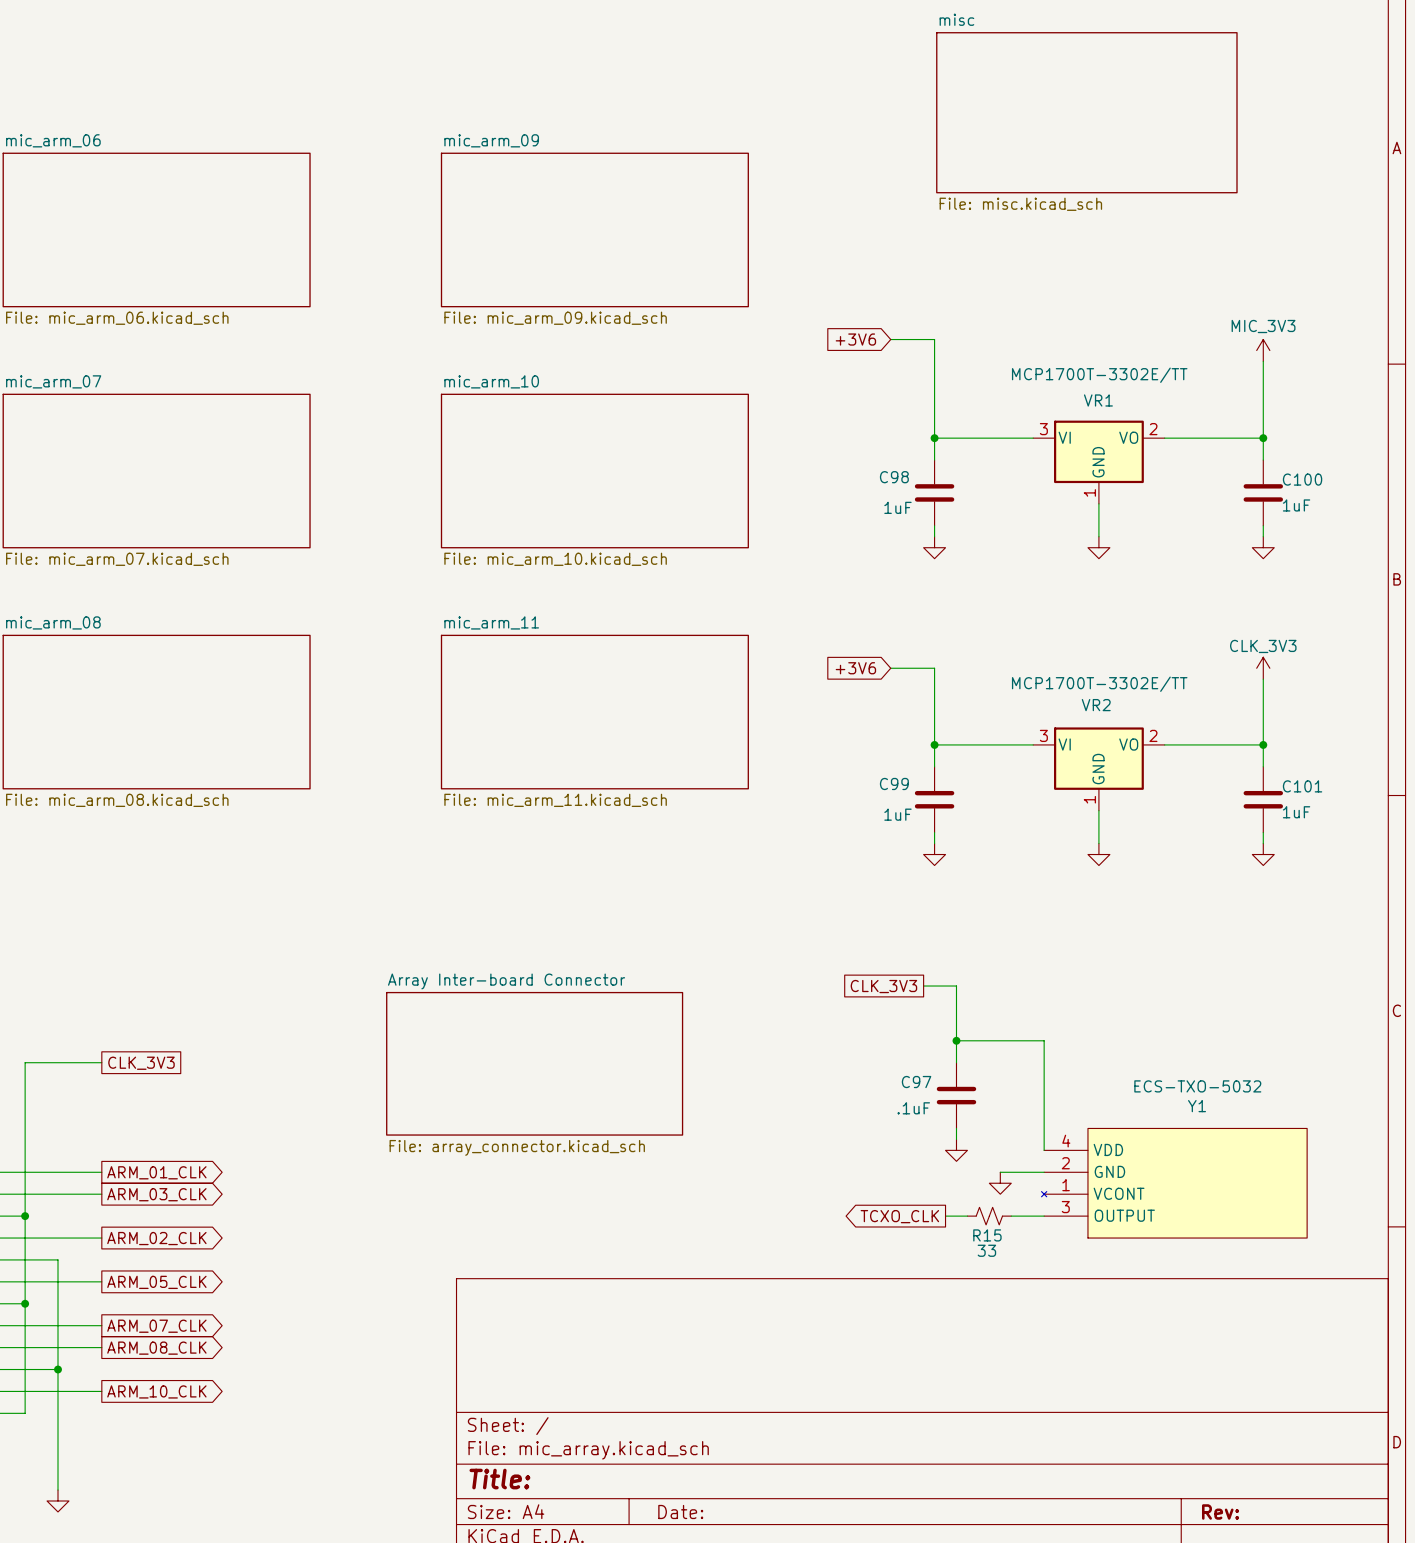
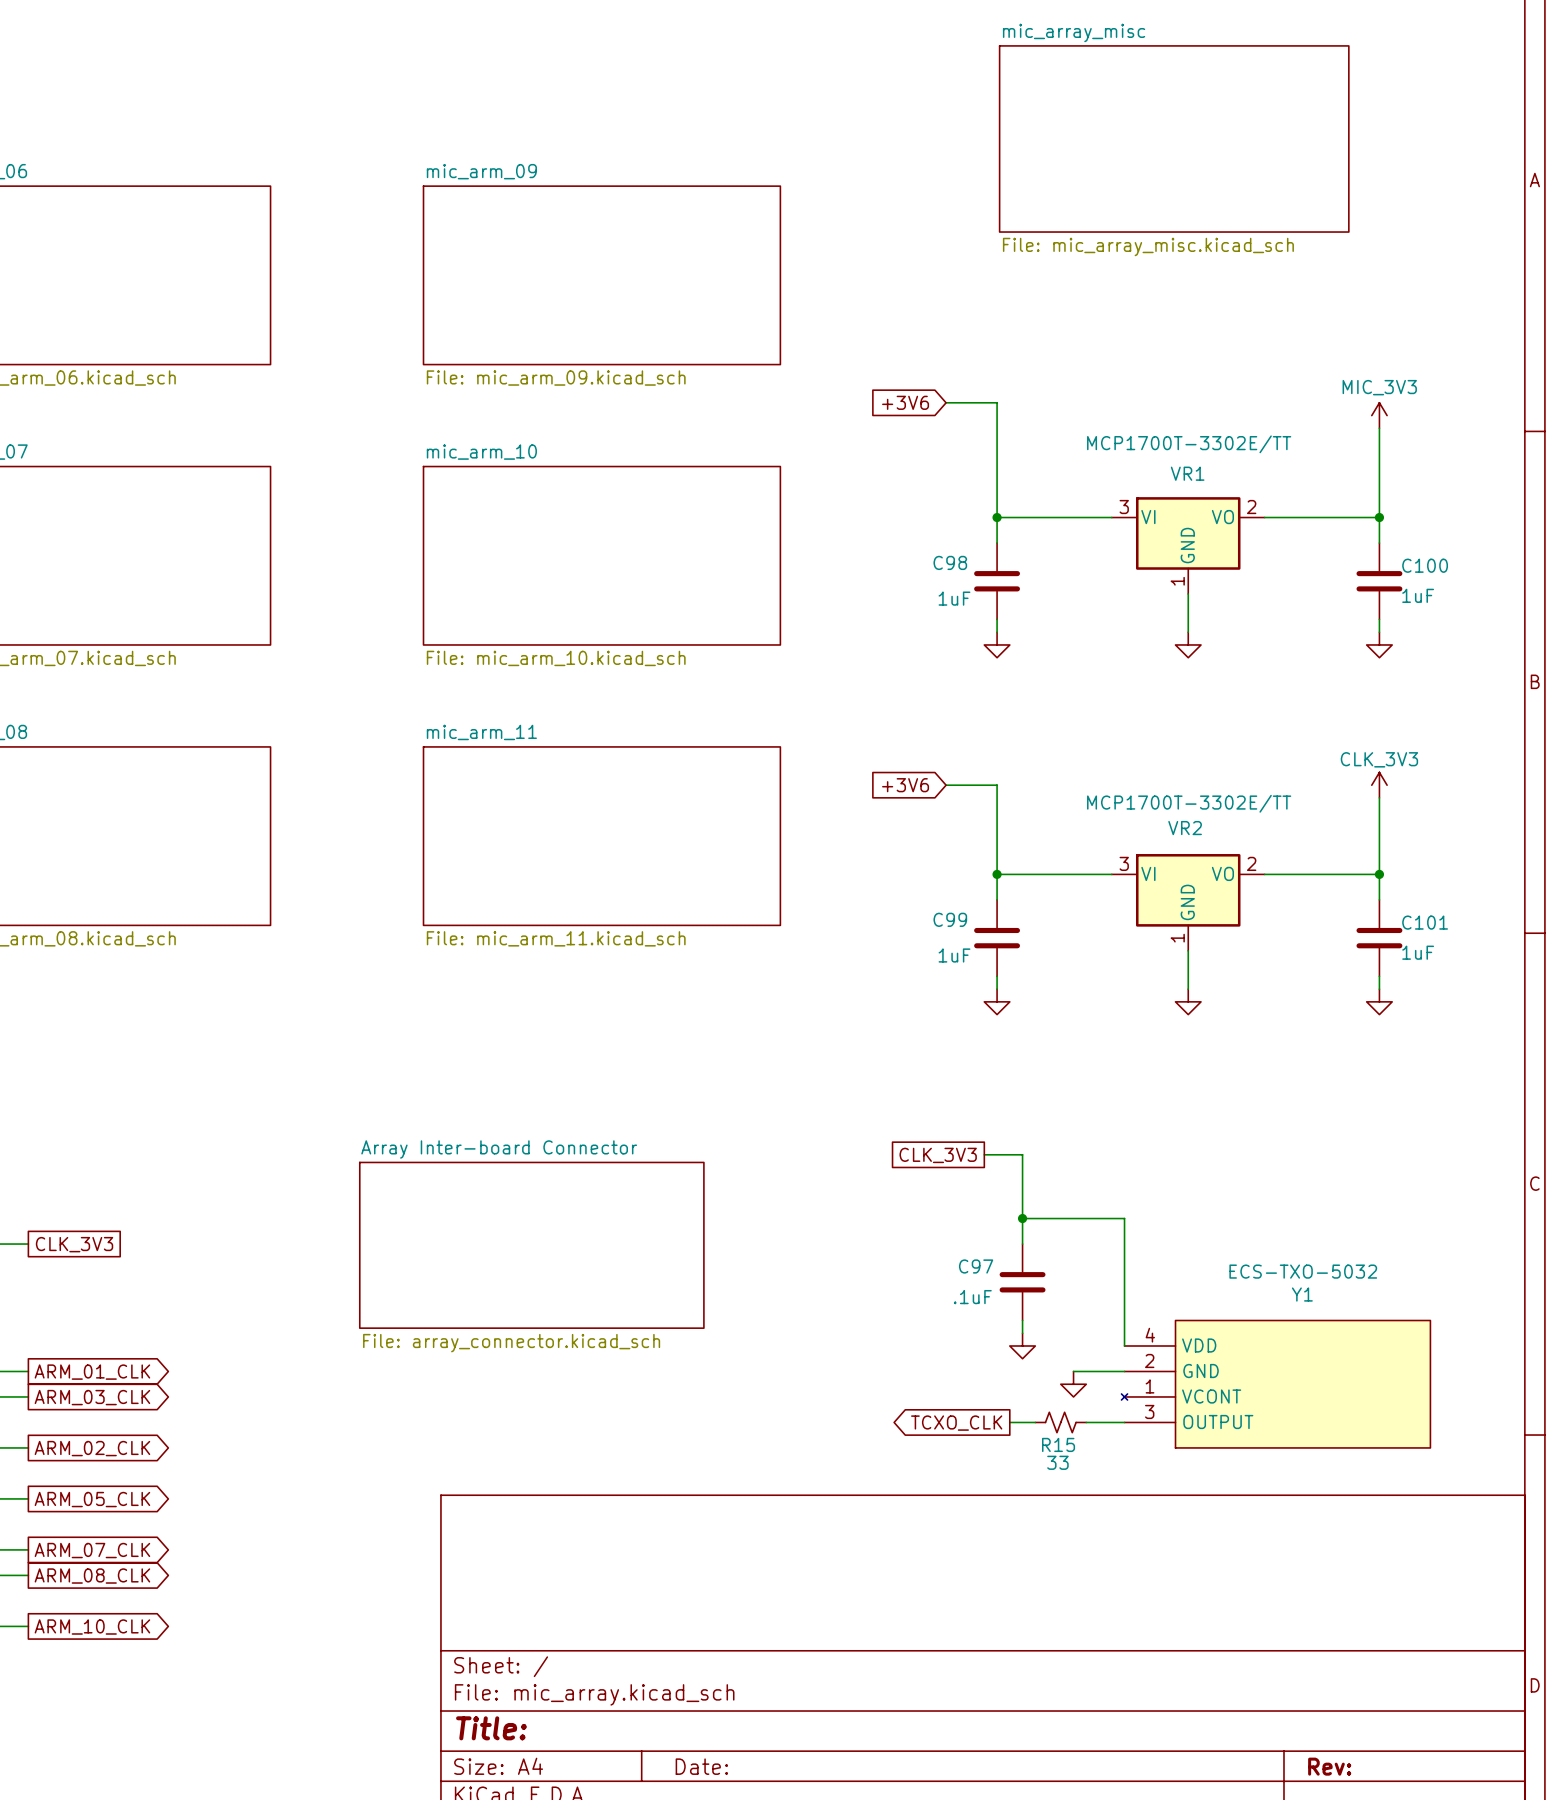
sheet misc name: misc (956, 19) -> mic_array_misc (1074, 32)
sheet misc value: File: misc.kicad_sch (1020, 204) -> File: mic_array_misc.kicad_sch (1148, 246)

